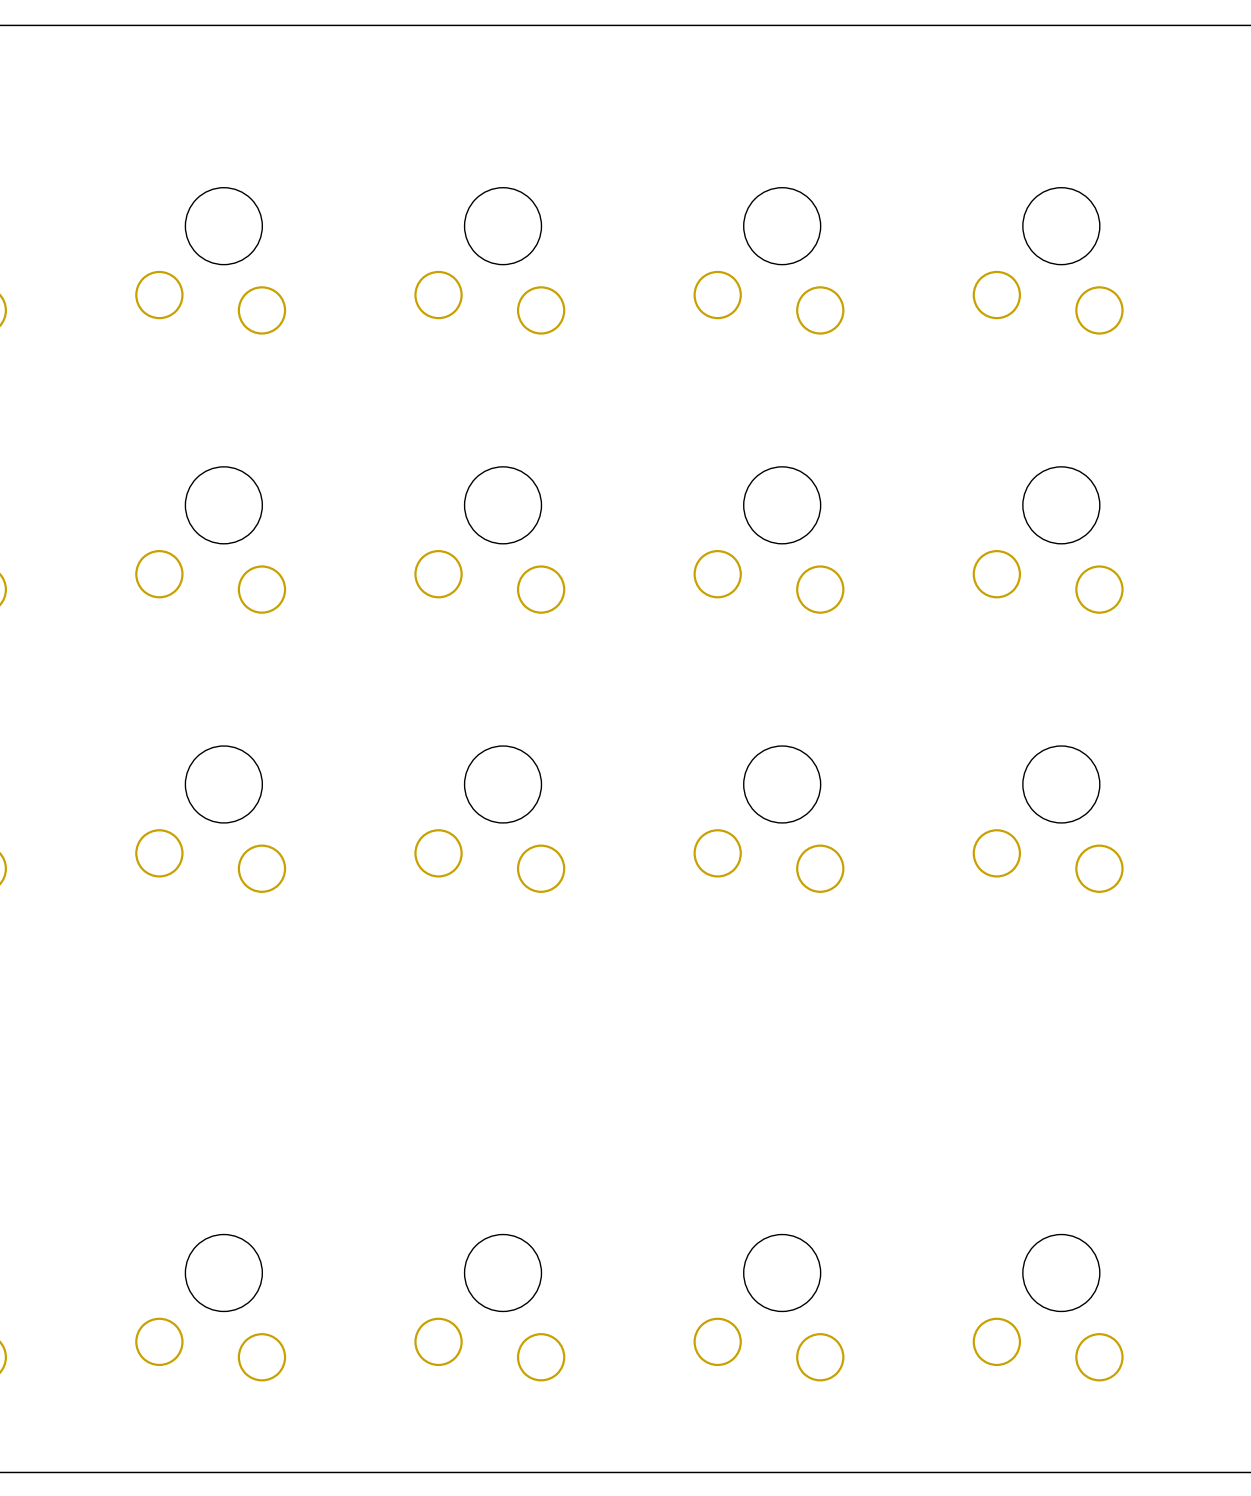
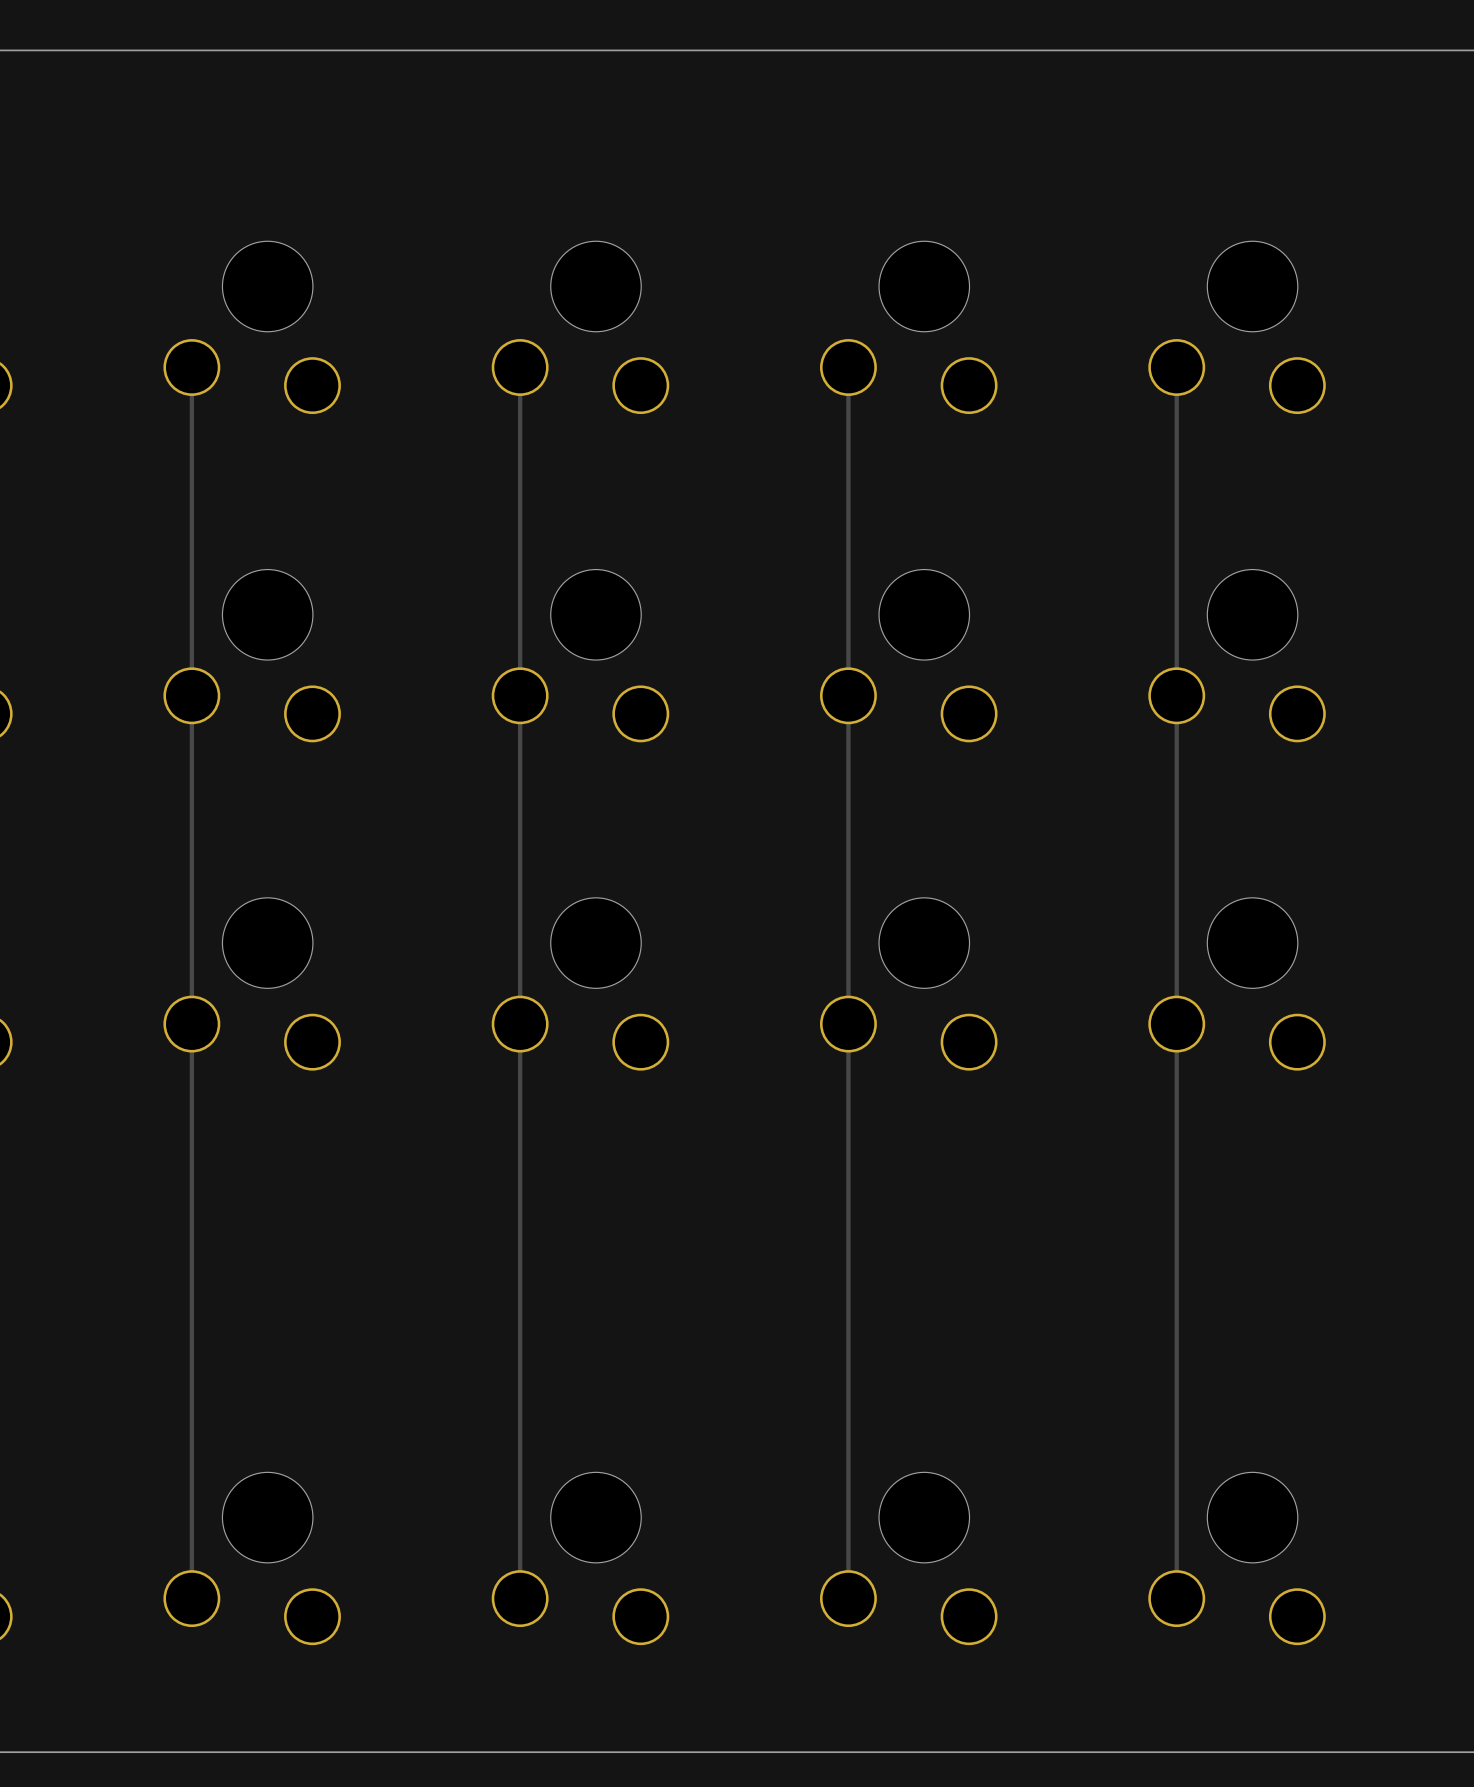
track: none -> (191, 367) (191, 1598)
track: none -> (520, 367) (520, 1598)
track: none -> (848, 367) (848, 1598)
track: none -> (1176, 367) (1176, 1598)

